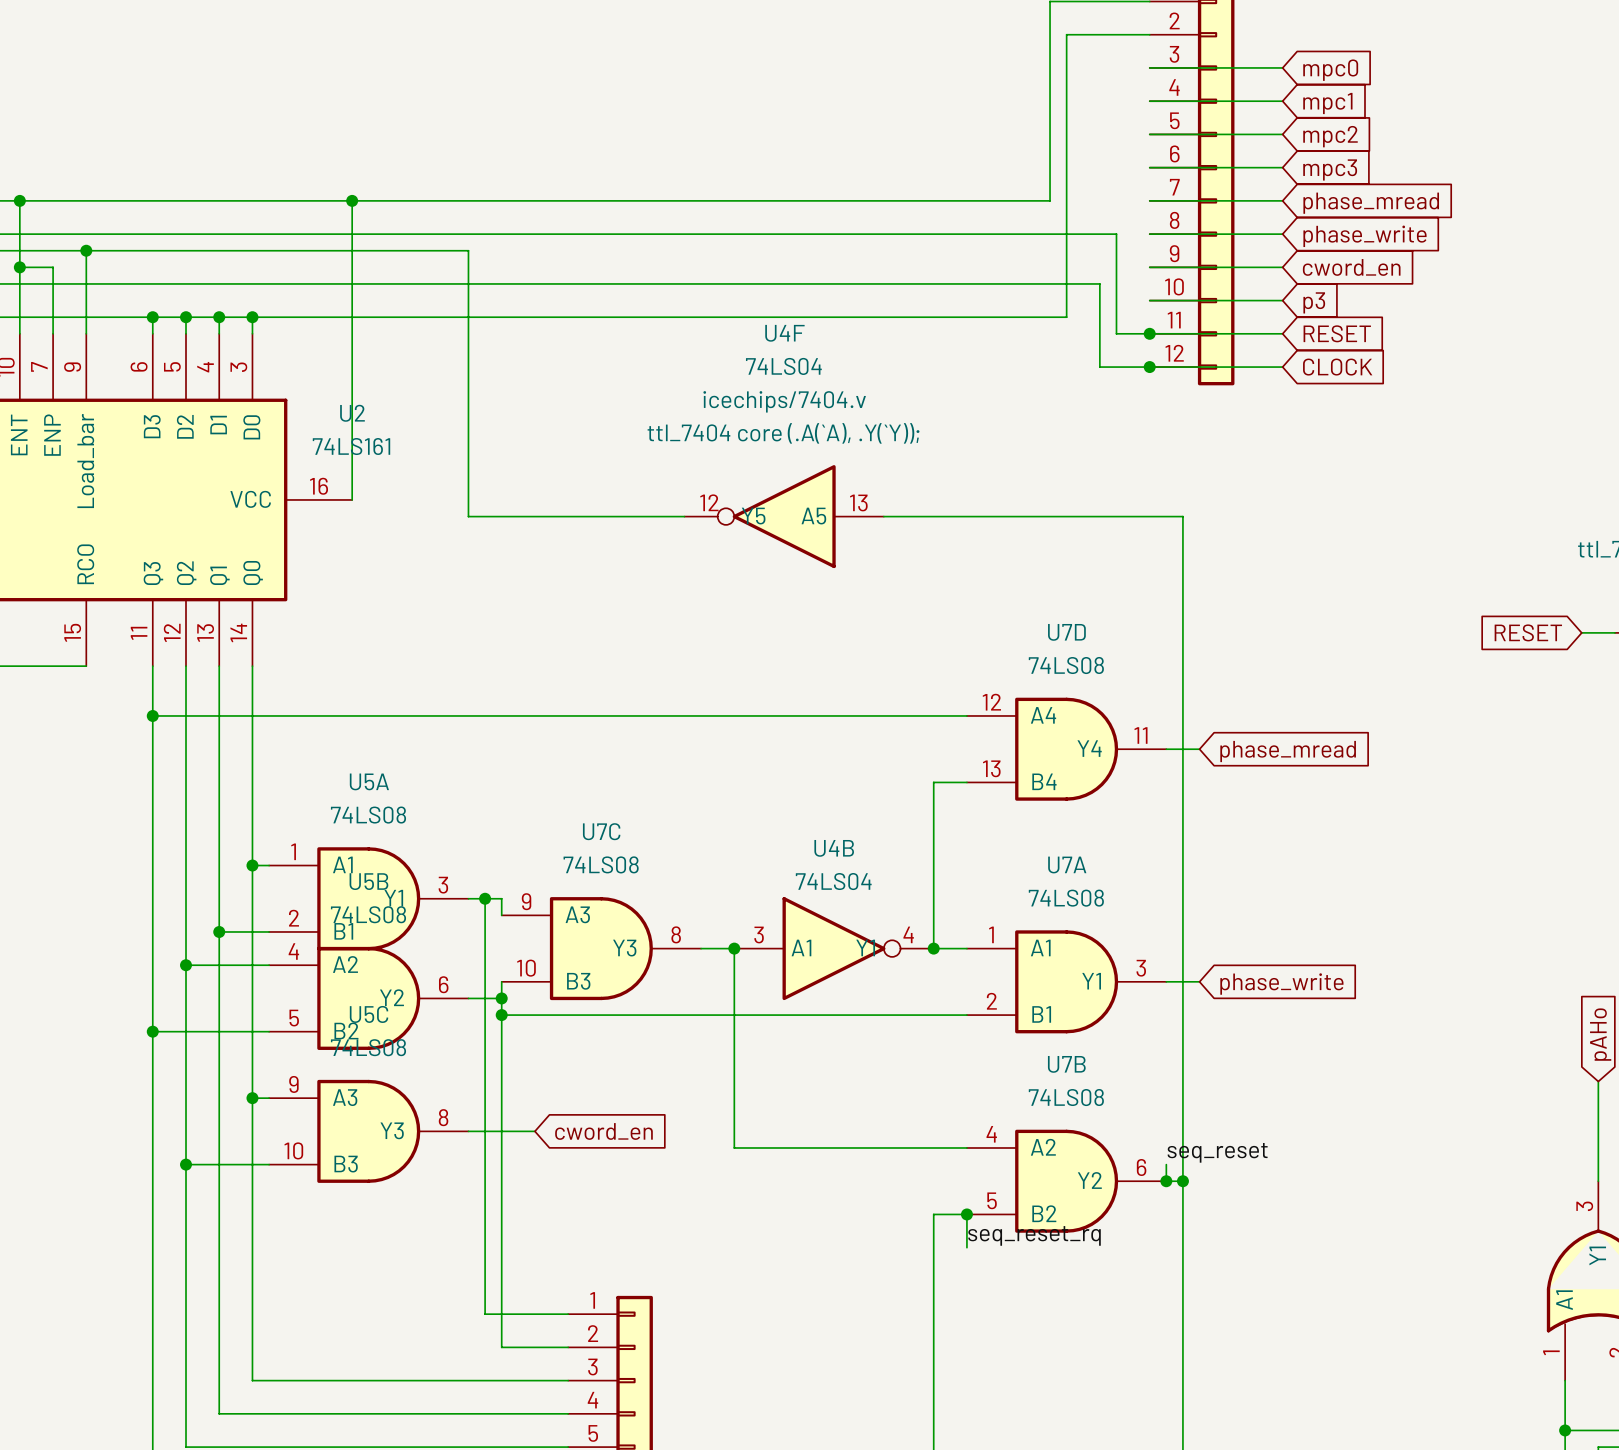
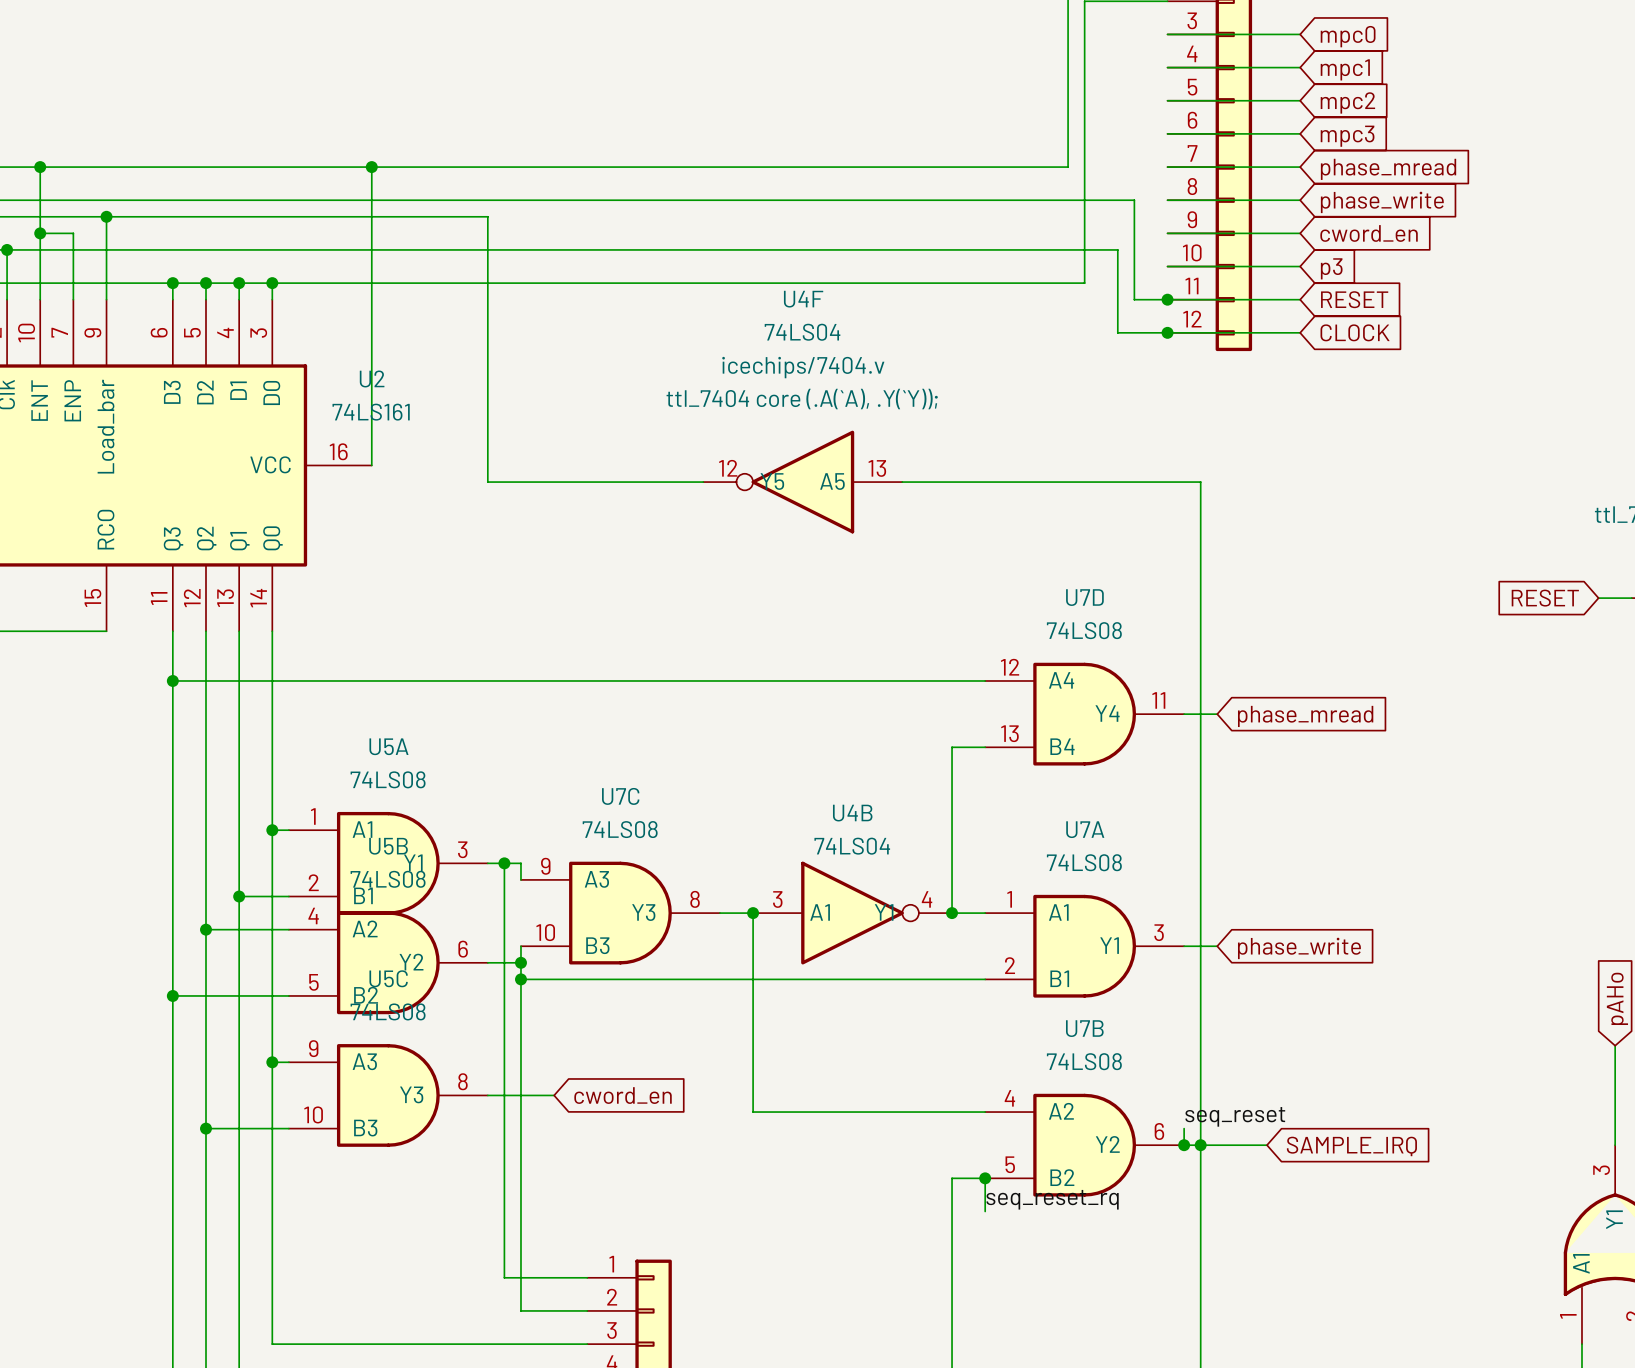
wire: none -> (1200, 1145) (1267, 1145)
global label: none -> SAMPLE_IRQ (1351, 1146)

